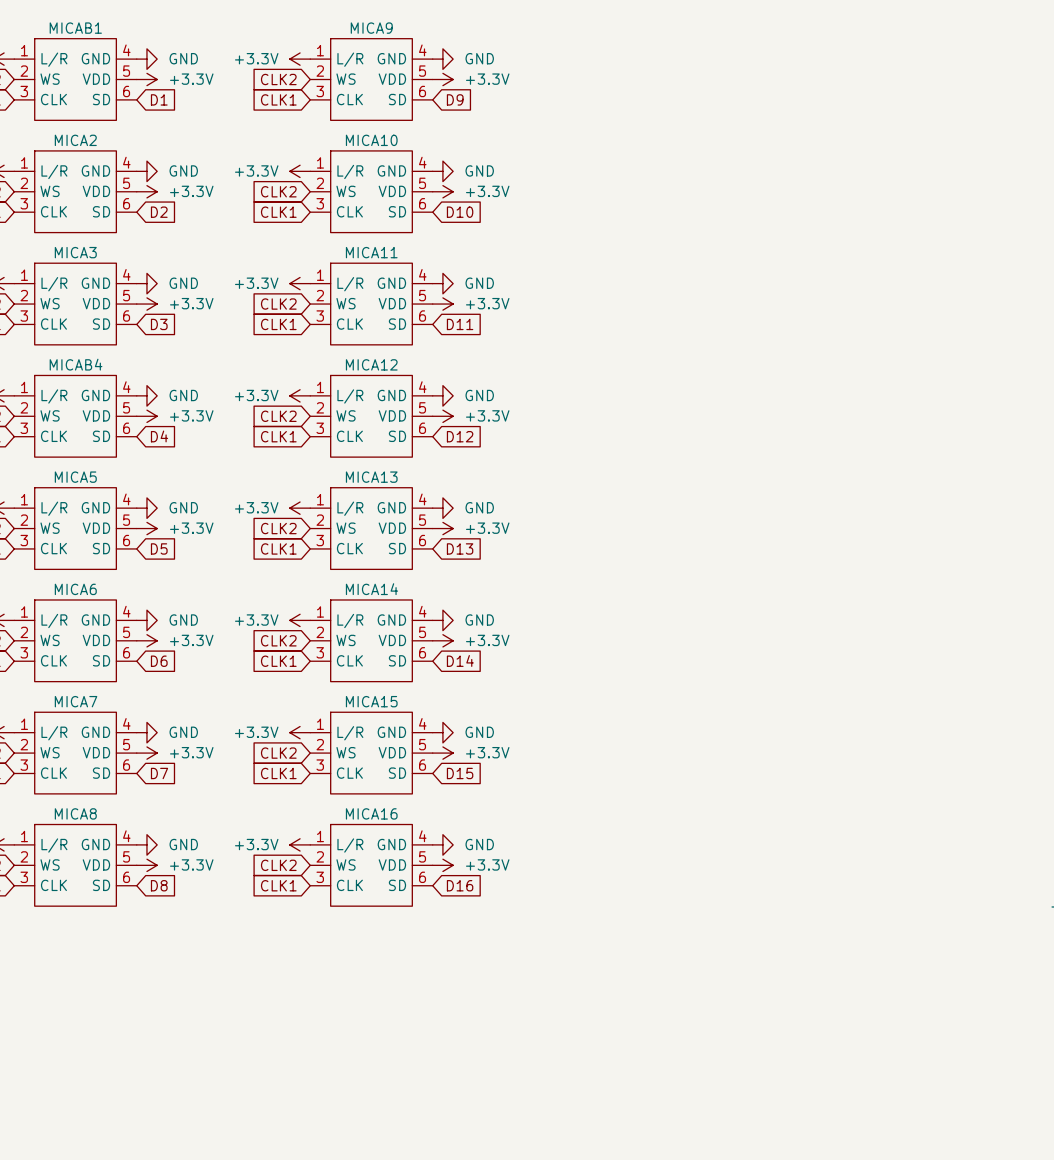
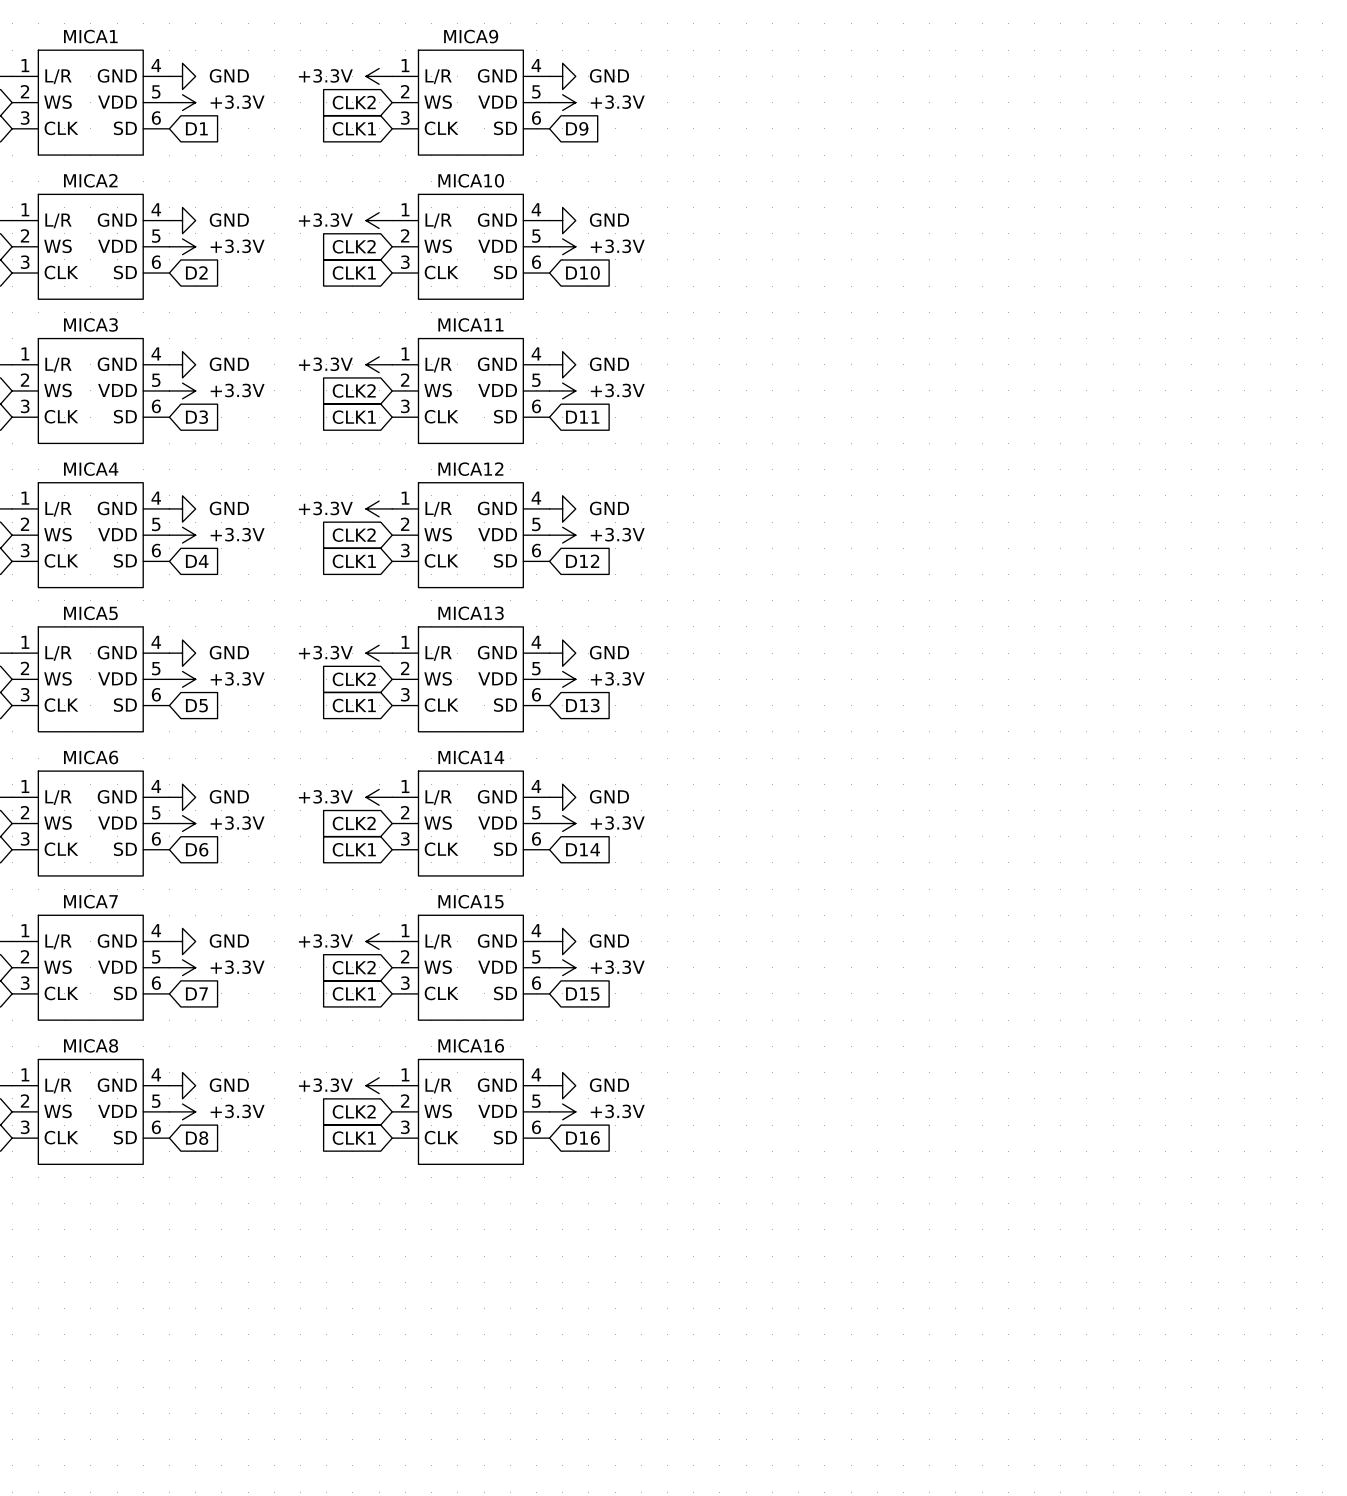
MICAB1 name: MICAB1 (75, 28) -> MICA1 (90, 36)
MICAB4 name: MICAB4 (76, 364) -> MICA4 (91, 469)

